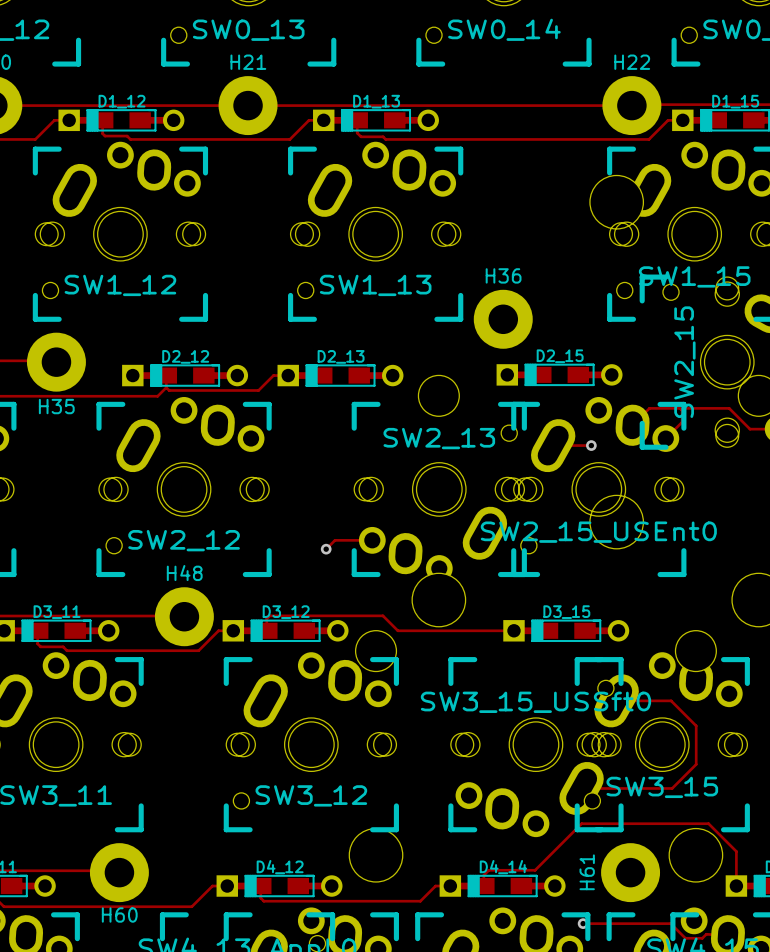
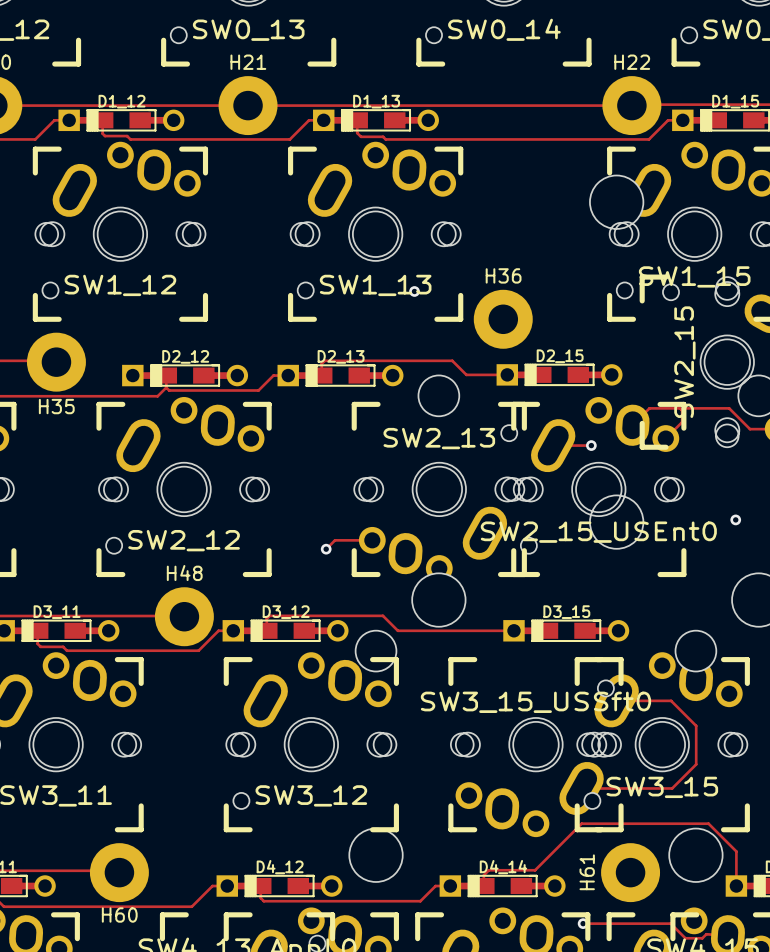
via: none -> (414, 291)
track: none -> (507, 374) (466, 374) (452, 360) (324, 360) (321, 363) (321, 375)
via: none -> (735, 519)

